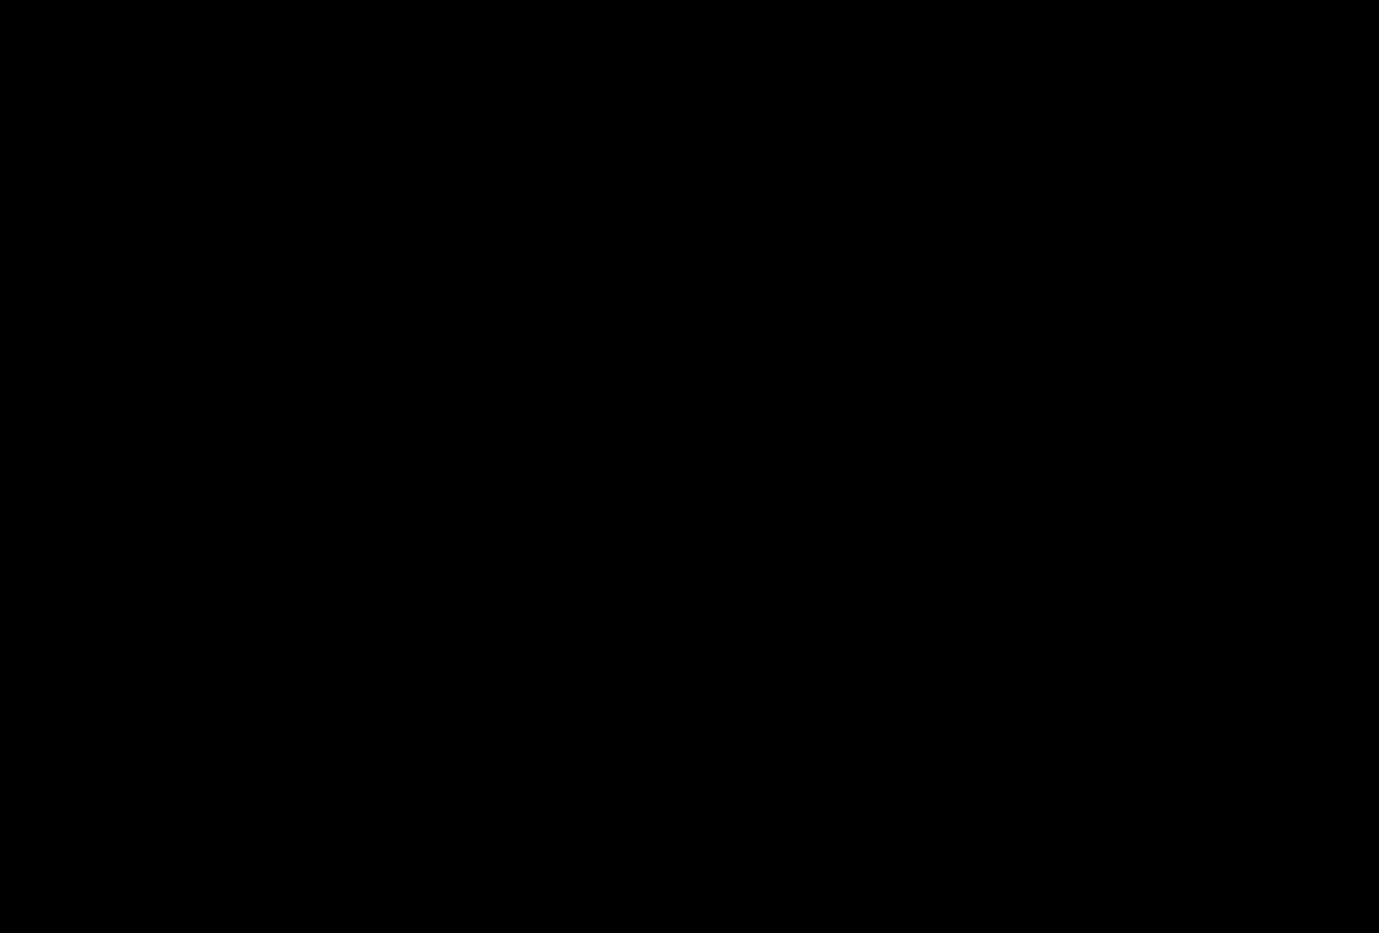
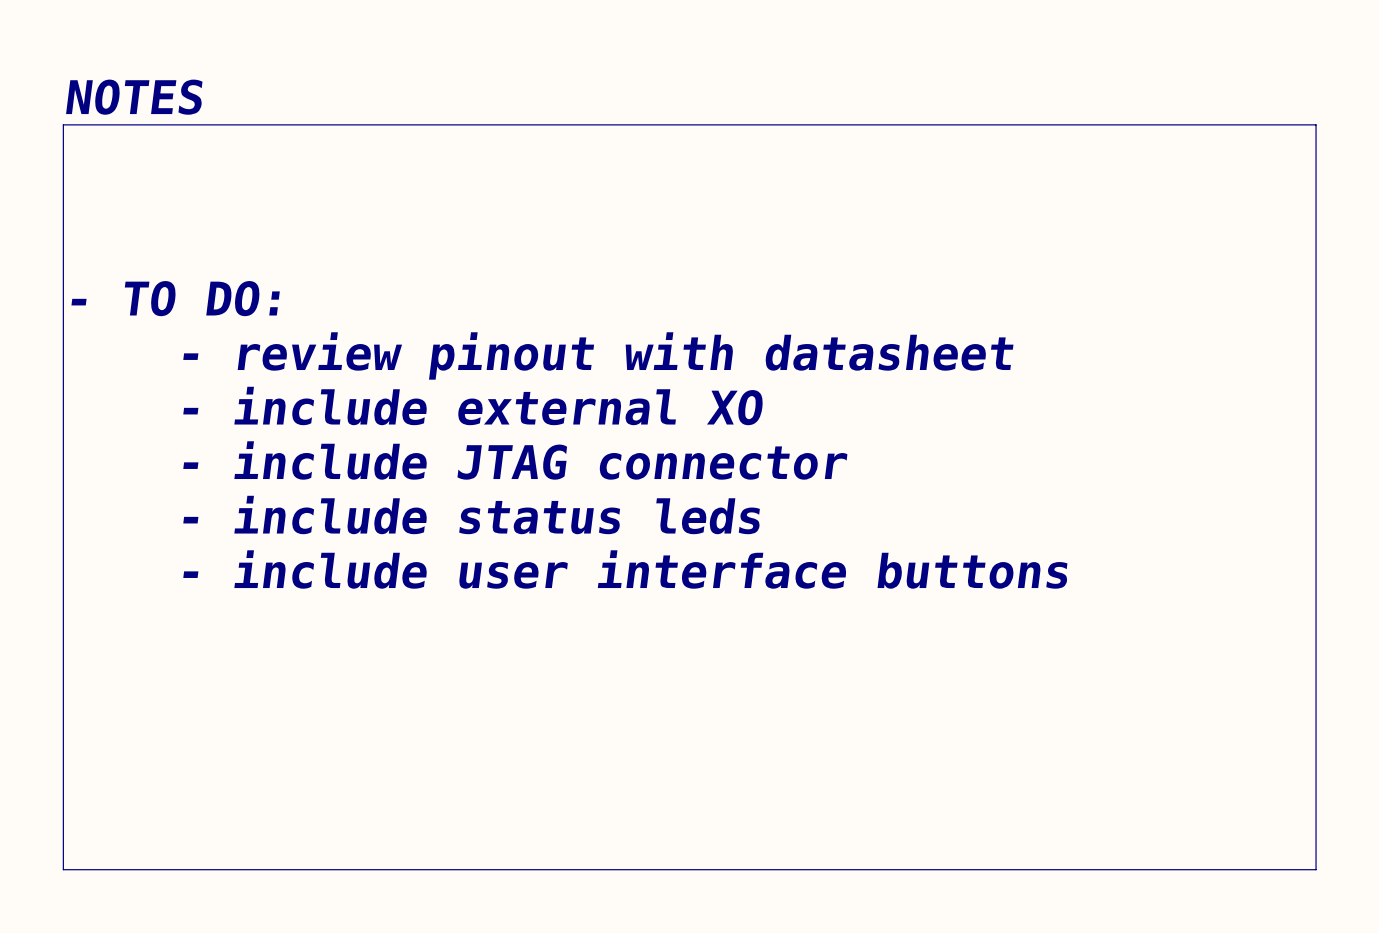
text: none -> NOTES (134, 97)
line: none -> (63, 124) (1316, 124) (1316, 869) (63, 869) (63, 124)
text: none -> - TO DO: (175, 298)
text: none -> - review pinout with datasheet (598, 355)
text: none -> - include external XO (473, 405)
text: none -> - include JTAG connector (515, 460)
text: none -> - include status leds (471, 514)
text: none -> - include user interface buttons (625, 569)

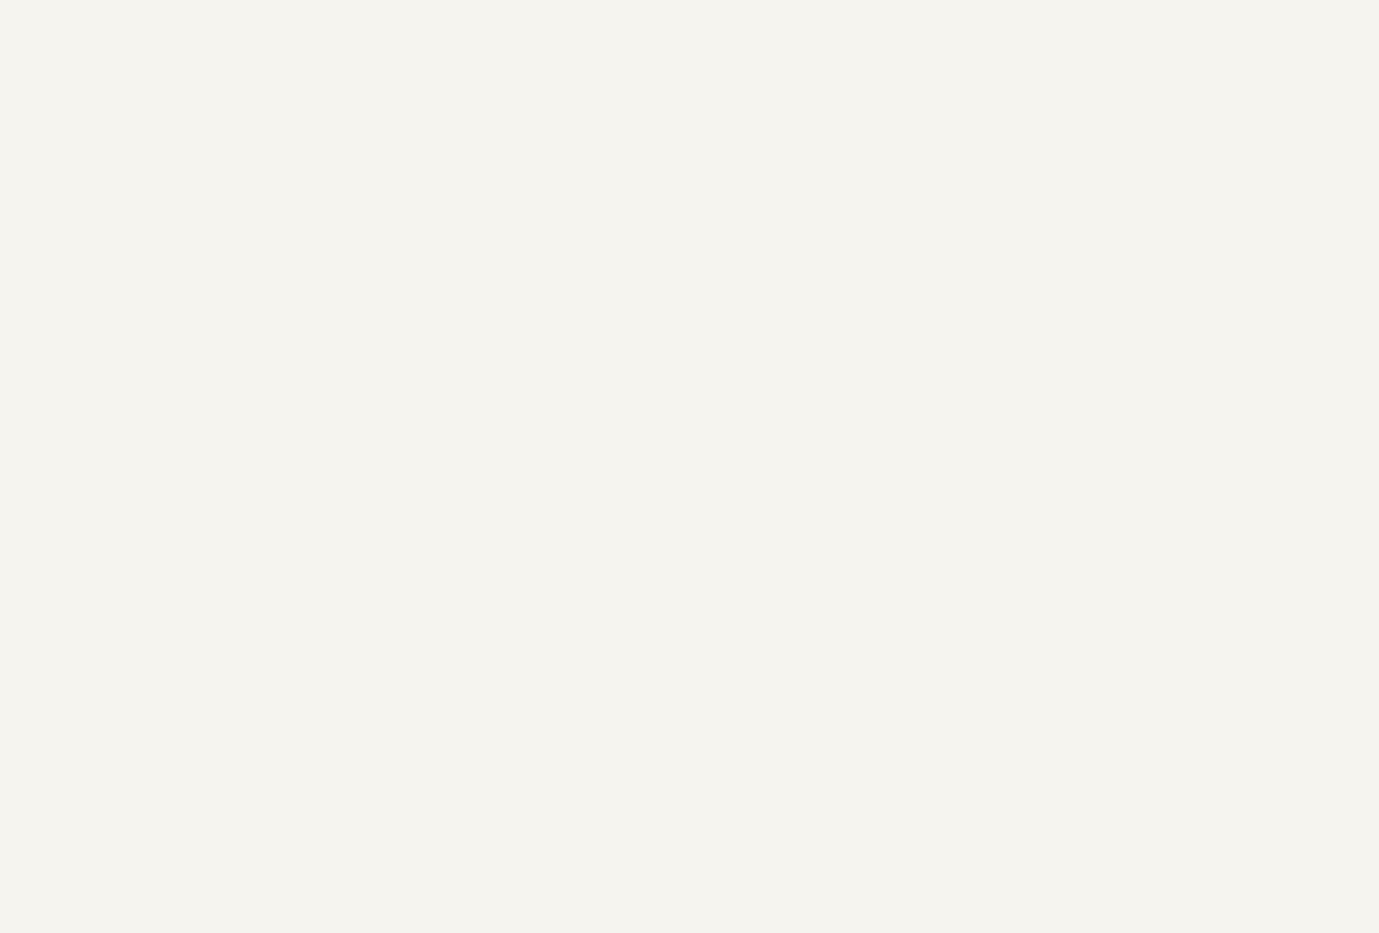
text: NOTES (134, 97) -> none
line: (63, 124) (1316, 124) (1316, 869) (63, 869) (63, 124) -> none
text: - TO DO: (175, 298) -> none
text: - review pinout with datasheet (598, 355) -> none
text: - include external XO (473, 405) -> none
text: - include JTAG connector (515, 460) -> none
text: - include status leds (471, 514) -> none
text: - include user interface buttons (625, 569) -> none

